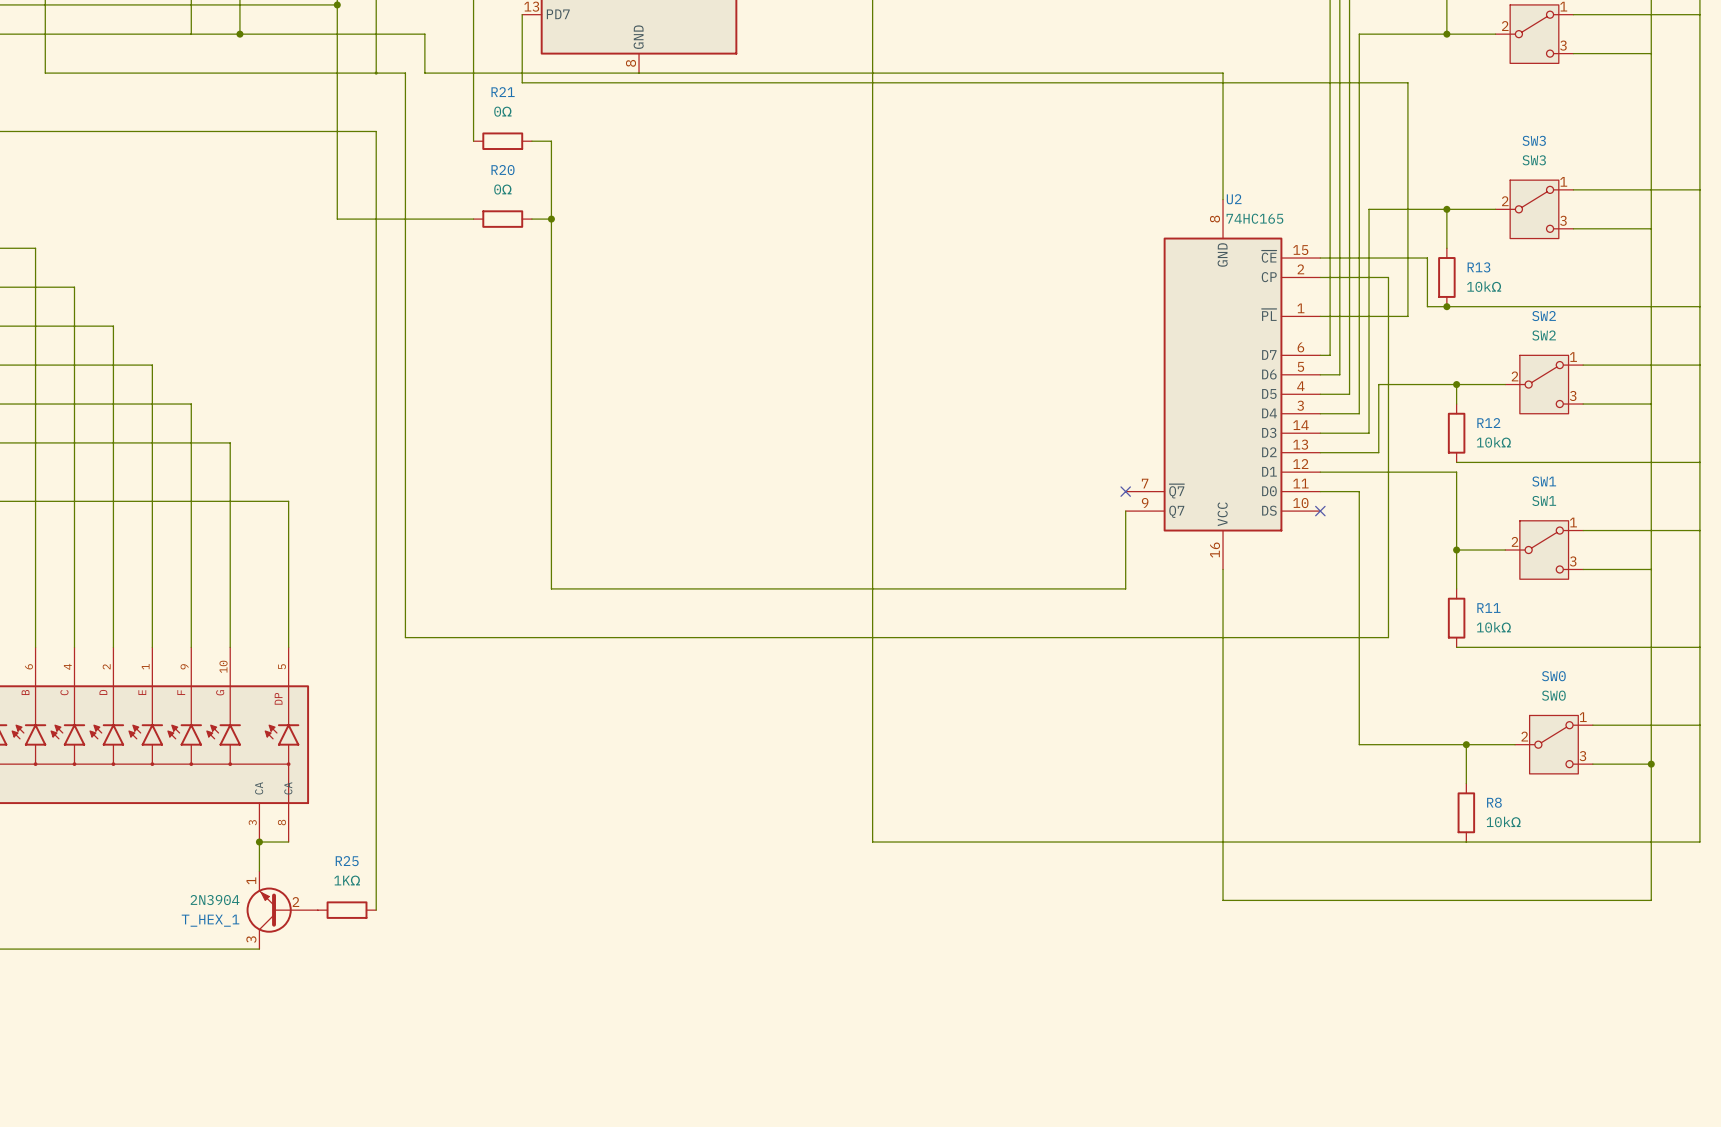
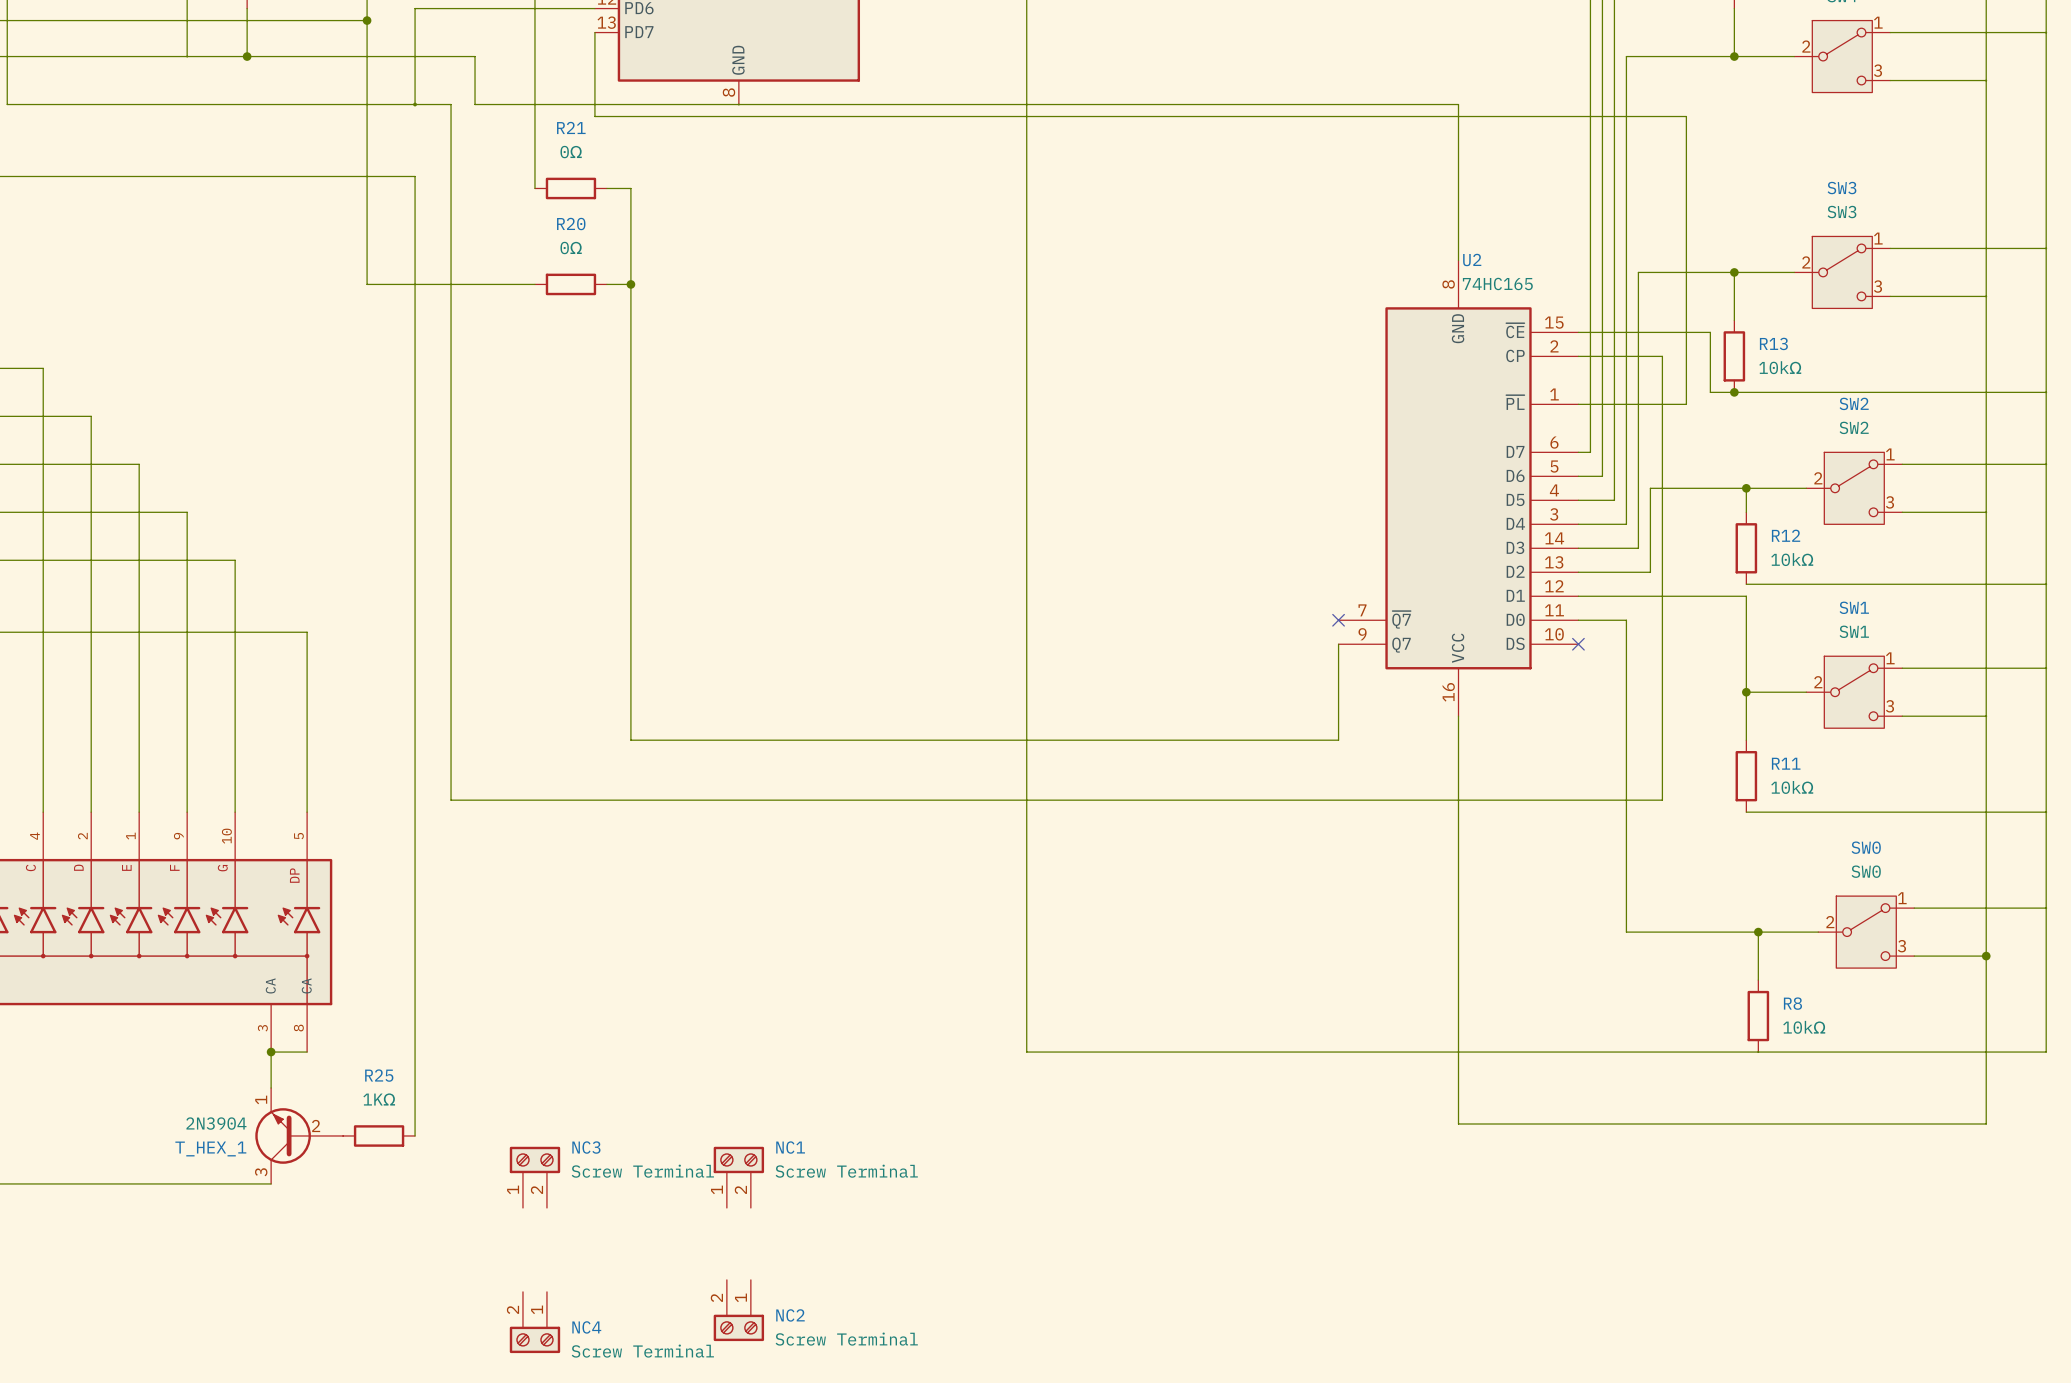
NC3: none -> Screw Terminal (534, 1177)
NC1: none -> Screw Terminal (738, 1177)
NC2: none -> Screw Terminal (738, 1310)
NC4: none -> Screw Terminal (534, 1322)

